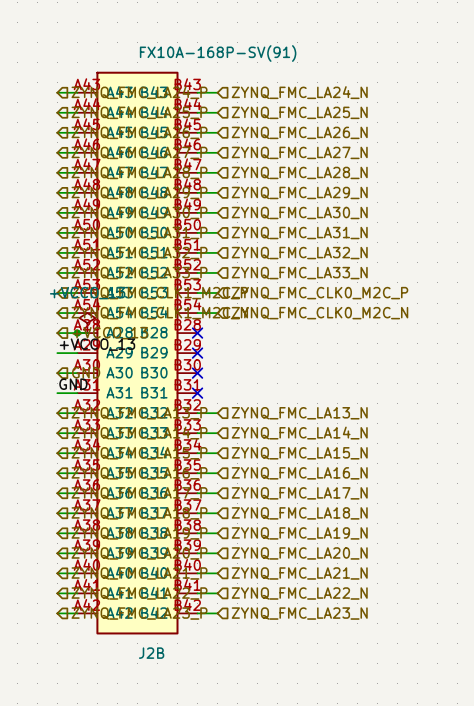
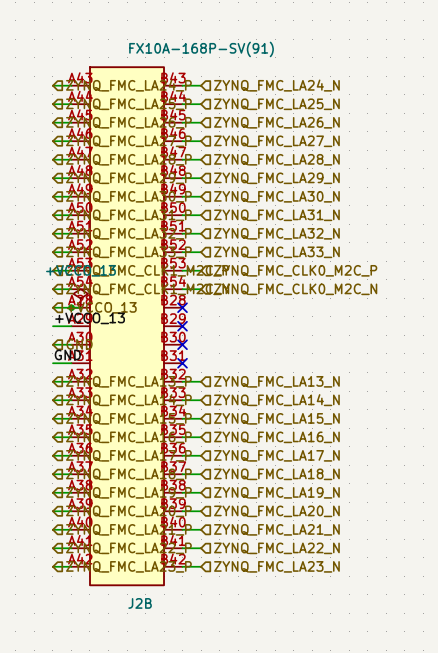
J2B symbol: [77, 71, 198, 635] -> [71, 66, 183, 587]

